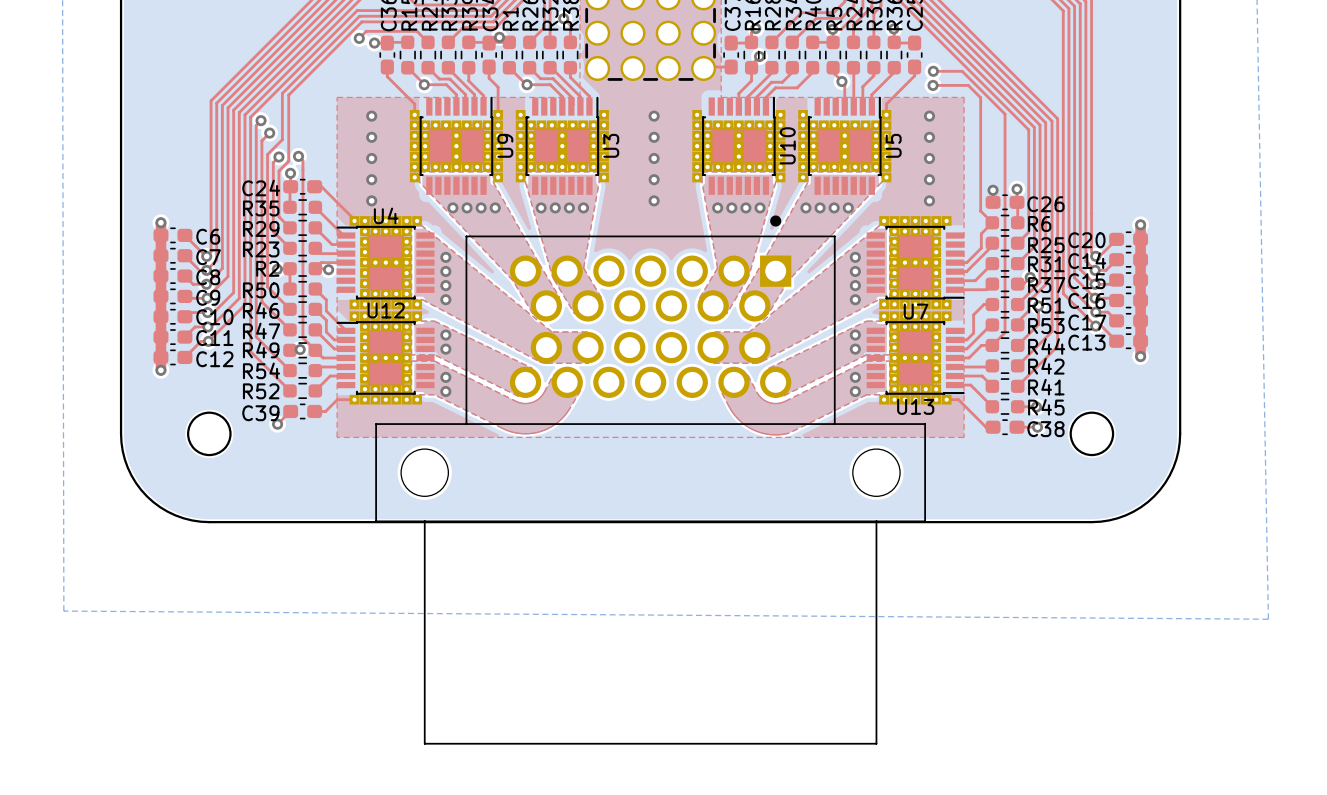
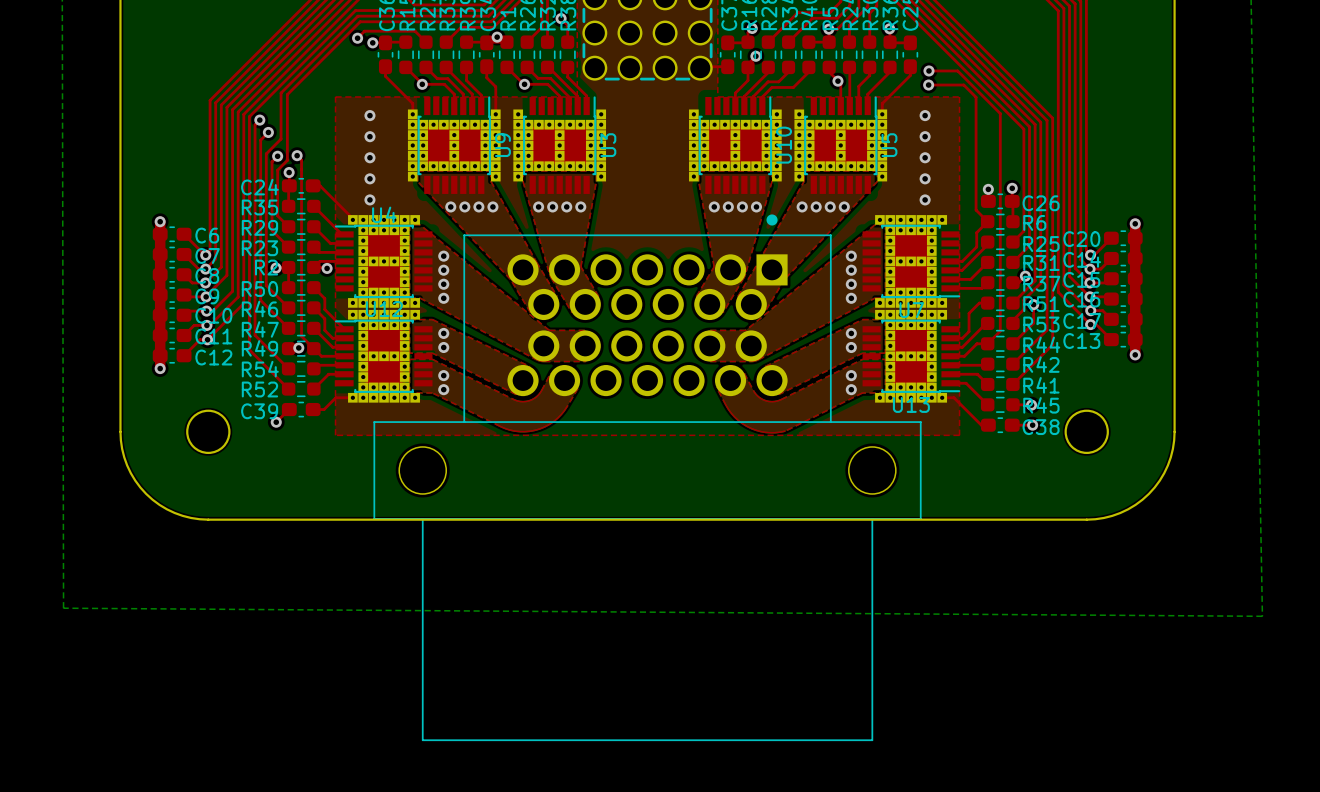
via: (654, 116) -> none
via: (654, 137) -> none
via: (654, 158) -> none
via: (654, 179) -> none
via: (654, 200) -> none

